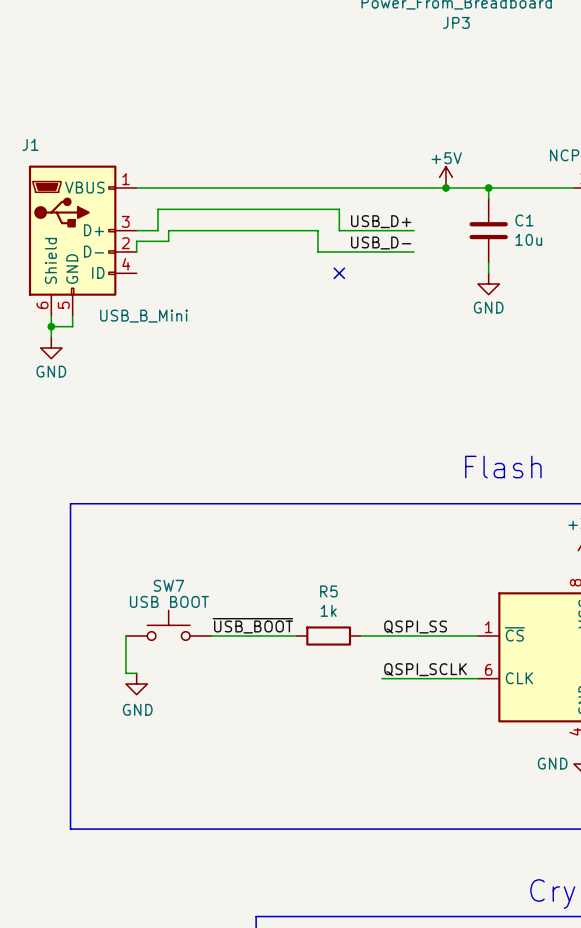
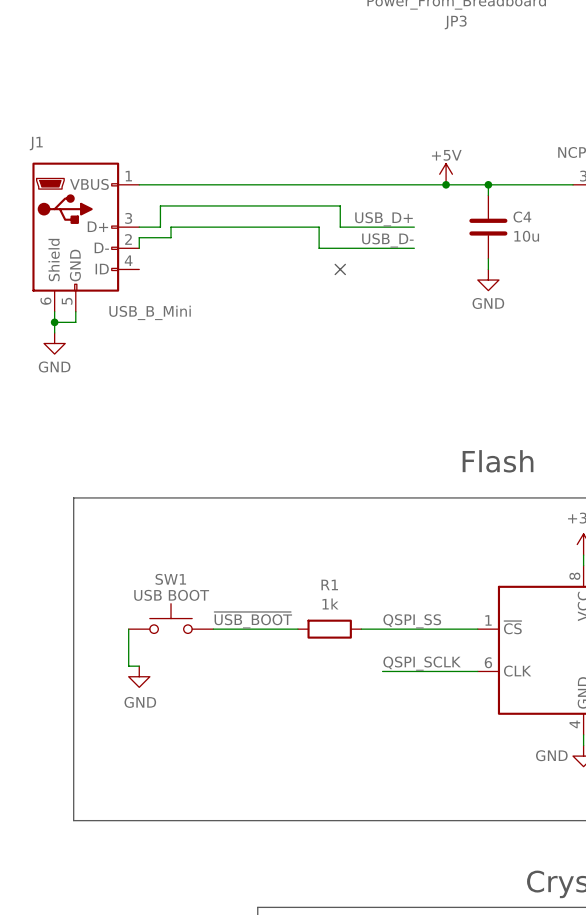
C1 name: C1 (524, 220) -> C4 (522, 217)
SW7 name: SW7 (168, 585) -> SW1 (170, 579)
R5 name: R5 (328, 591) -> R1 (329, 584)

